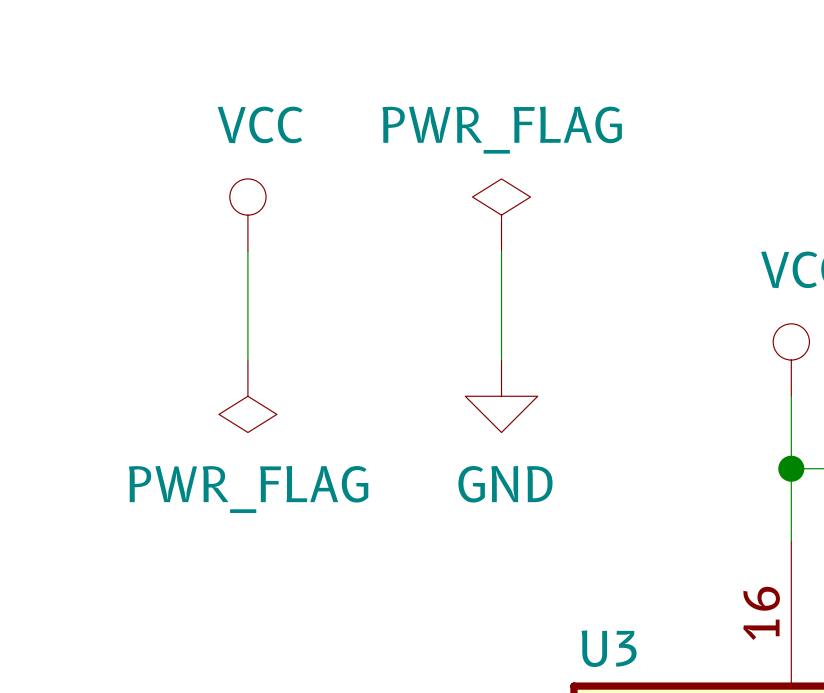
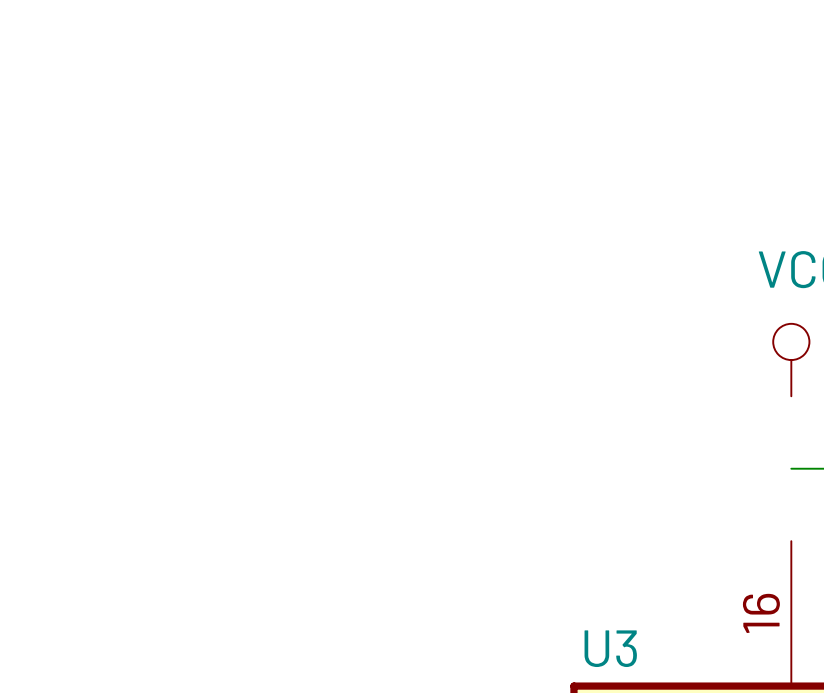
power symbol: VCC (247, 215) -> none
power symbol: PWR_FLAG (501, 215) -> none
wire: (247, 251) (247, 360) -> none
wire: (501, 251) (501, 360) -> none
power symbol: PWR_FLAG (247, 396) -> none
power symbol: GND (501, 396) -> none
wire: (791, 396) (791, 541) -> none
junction: (791, 468) -> none

